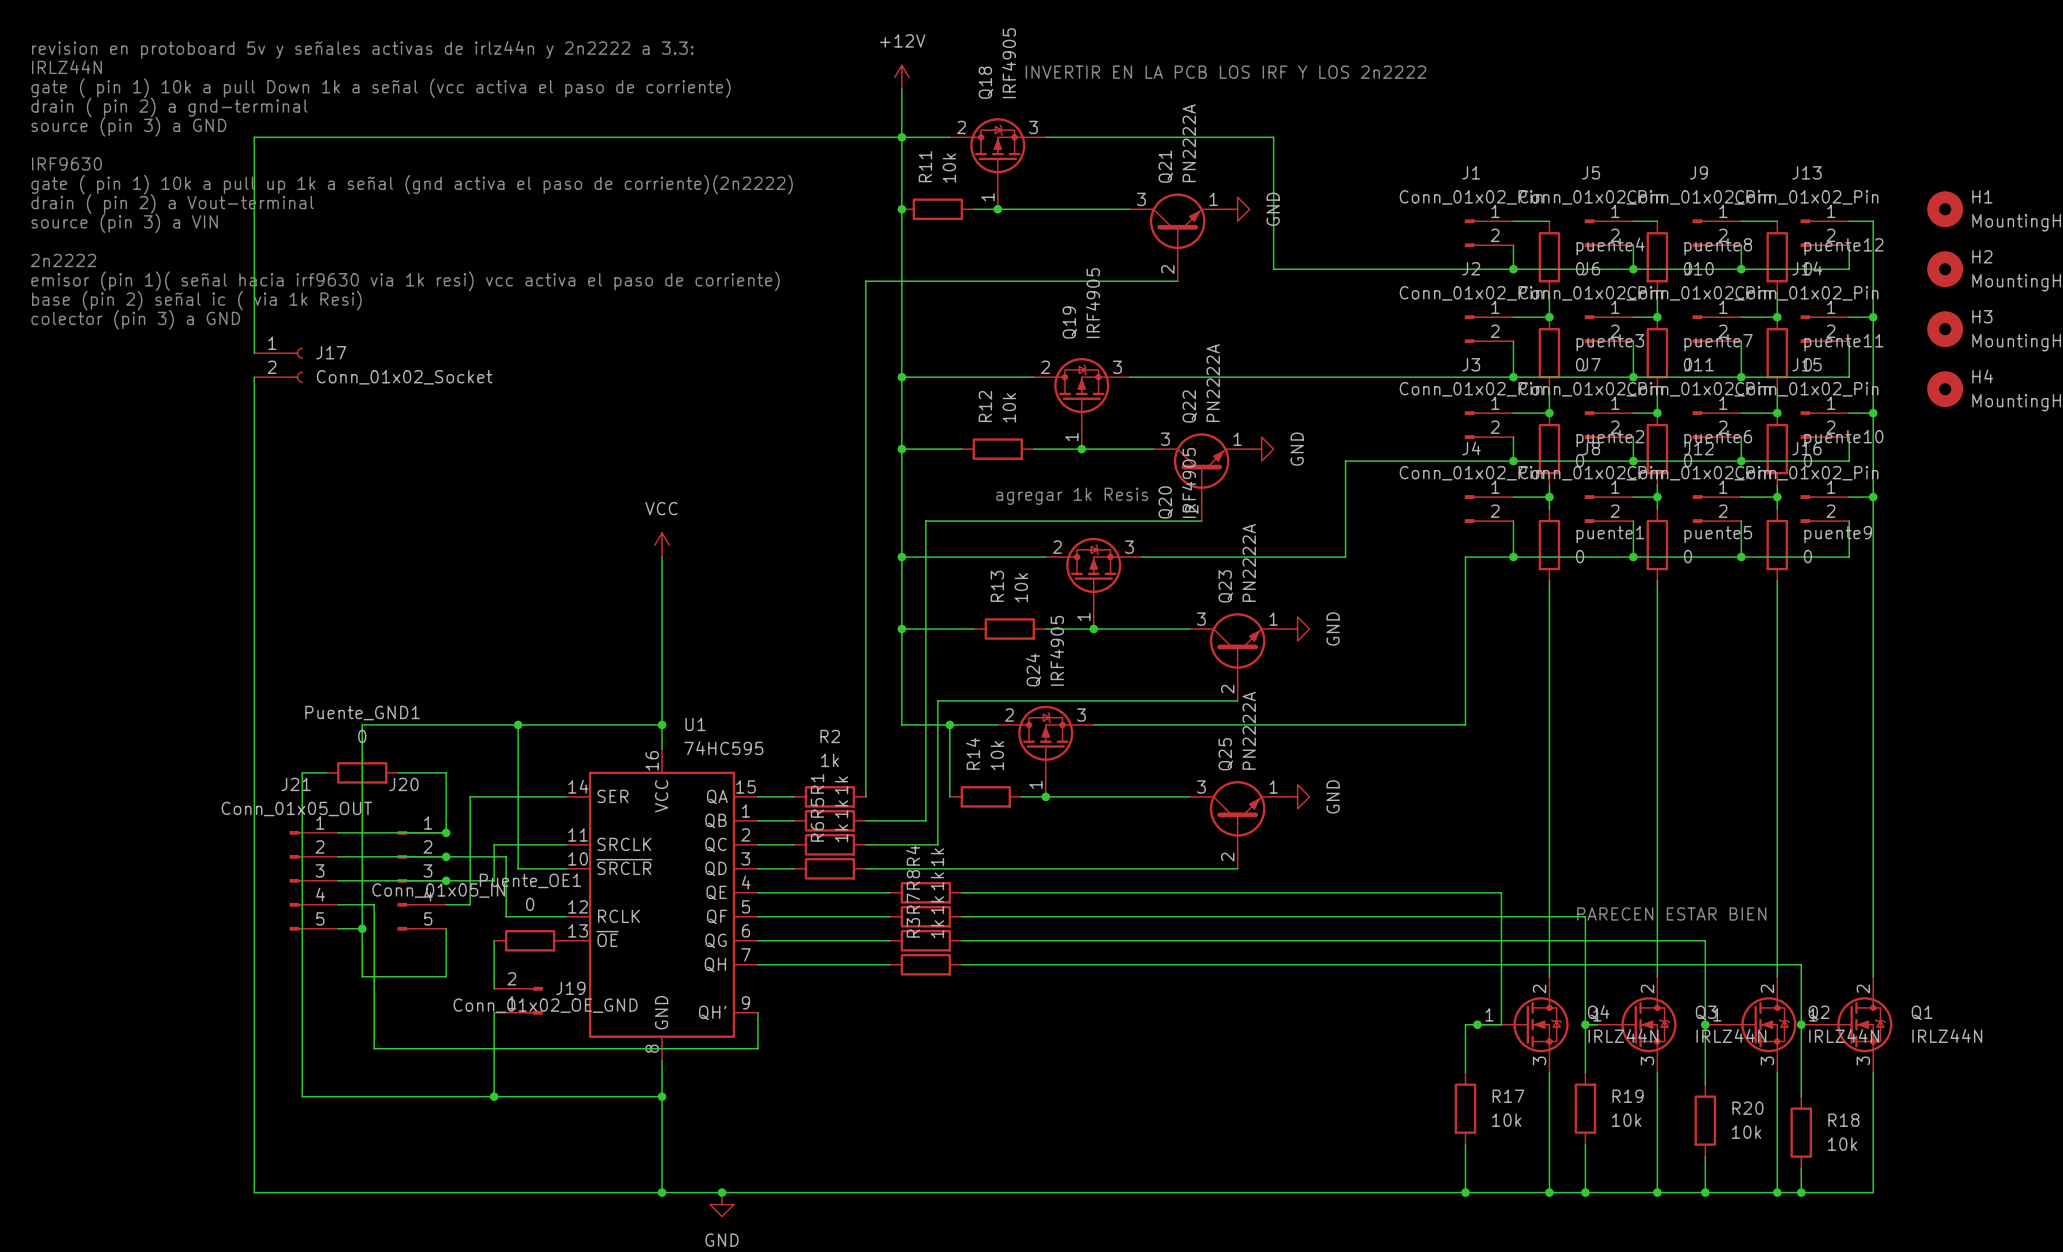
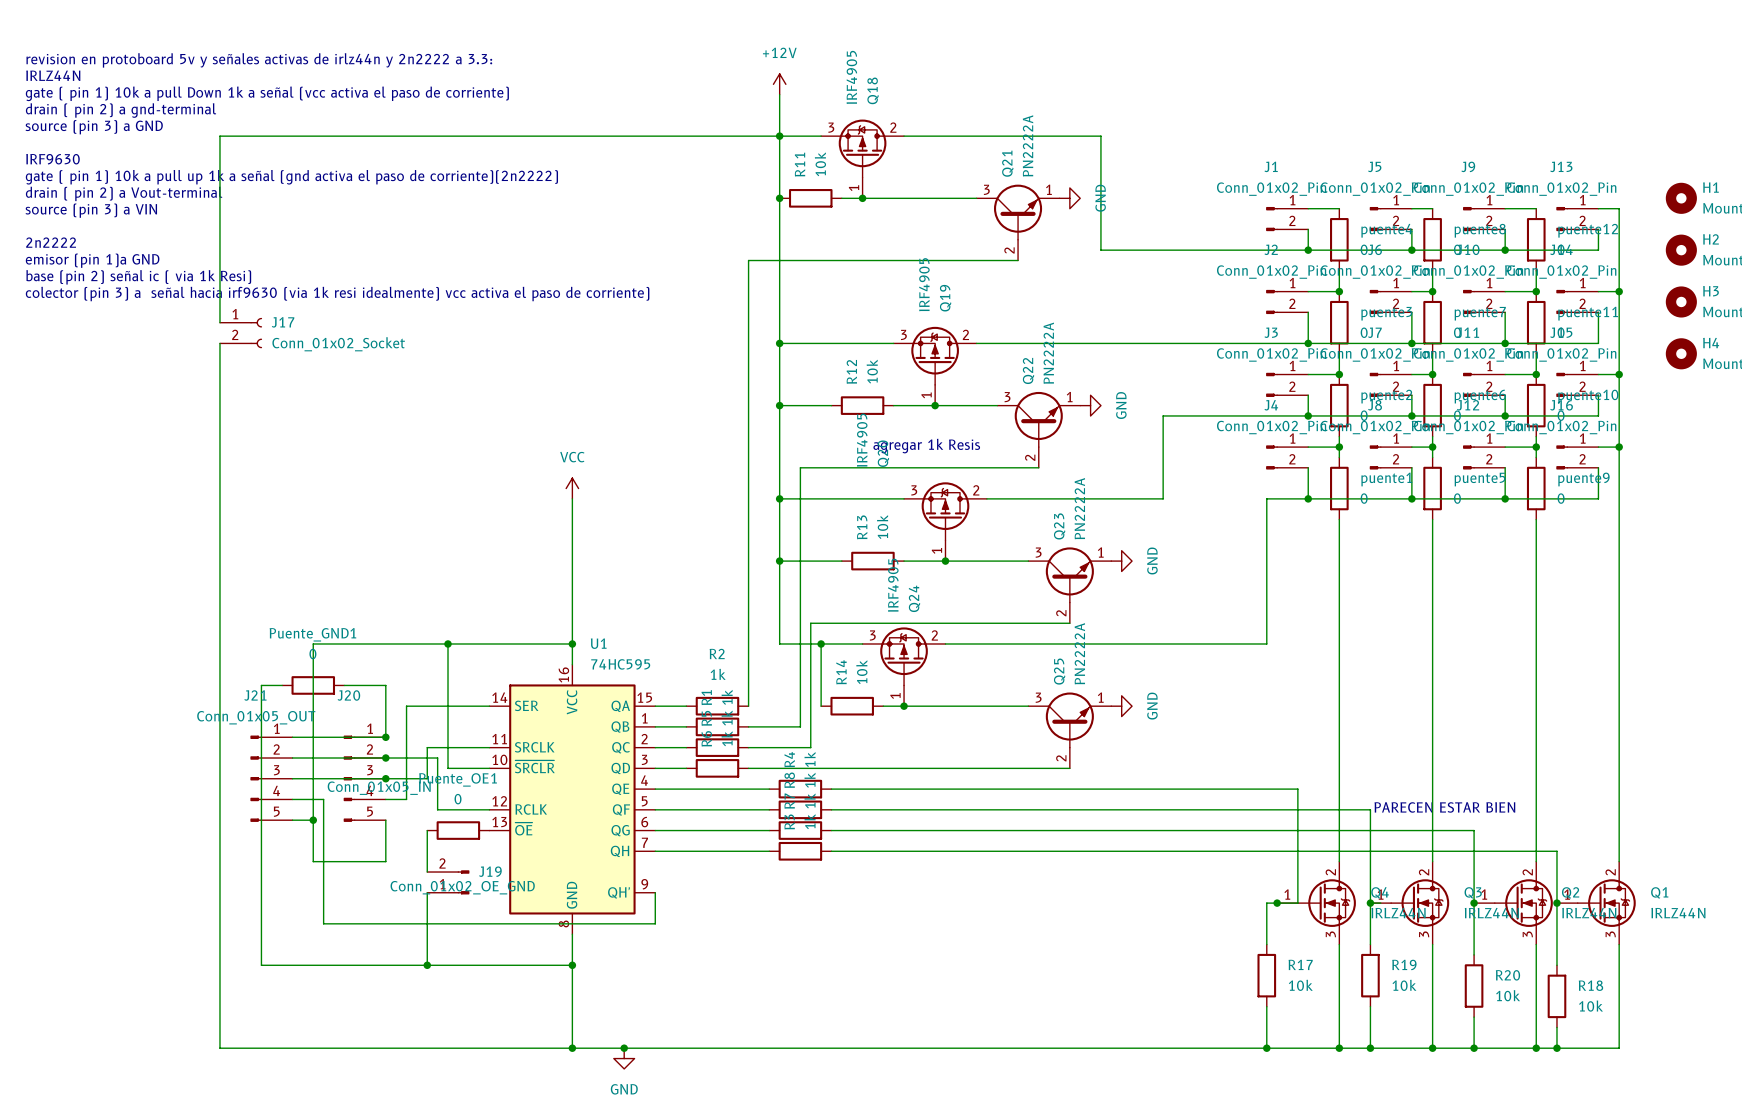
text: INVERTIR EN LA PCB LOS IRF Y LOS 2n2222 (1225, 72) -> none
Q18 flip: as is (997, 151) -> left-right (862, 148)
text: emisor (pin 1)( señal hacia irf9630 via 1k resi) vcc activa el paso de corriente) (405, 281) -> emisor (pin 1)a GND (92, 260)
text: colector (pin 3) a GND (135, 319) -> colector (pin 3) a señal hacia irf9630 (via 1k resi idealmente) vcc activa el paso de corriente) (337, 294)
Q19 flip: as is (1081, 391) -> left-right (935, 355)
Q20 flip: as is (1093, 571) -> left-right (945, 511)
Q24 flip: as is (1045, 739) -> left-right (904, 656)

